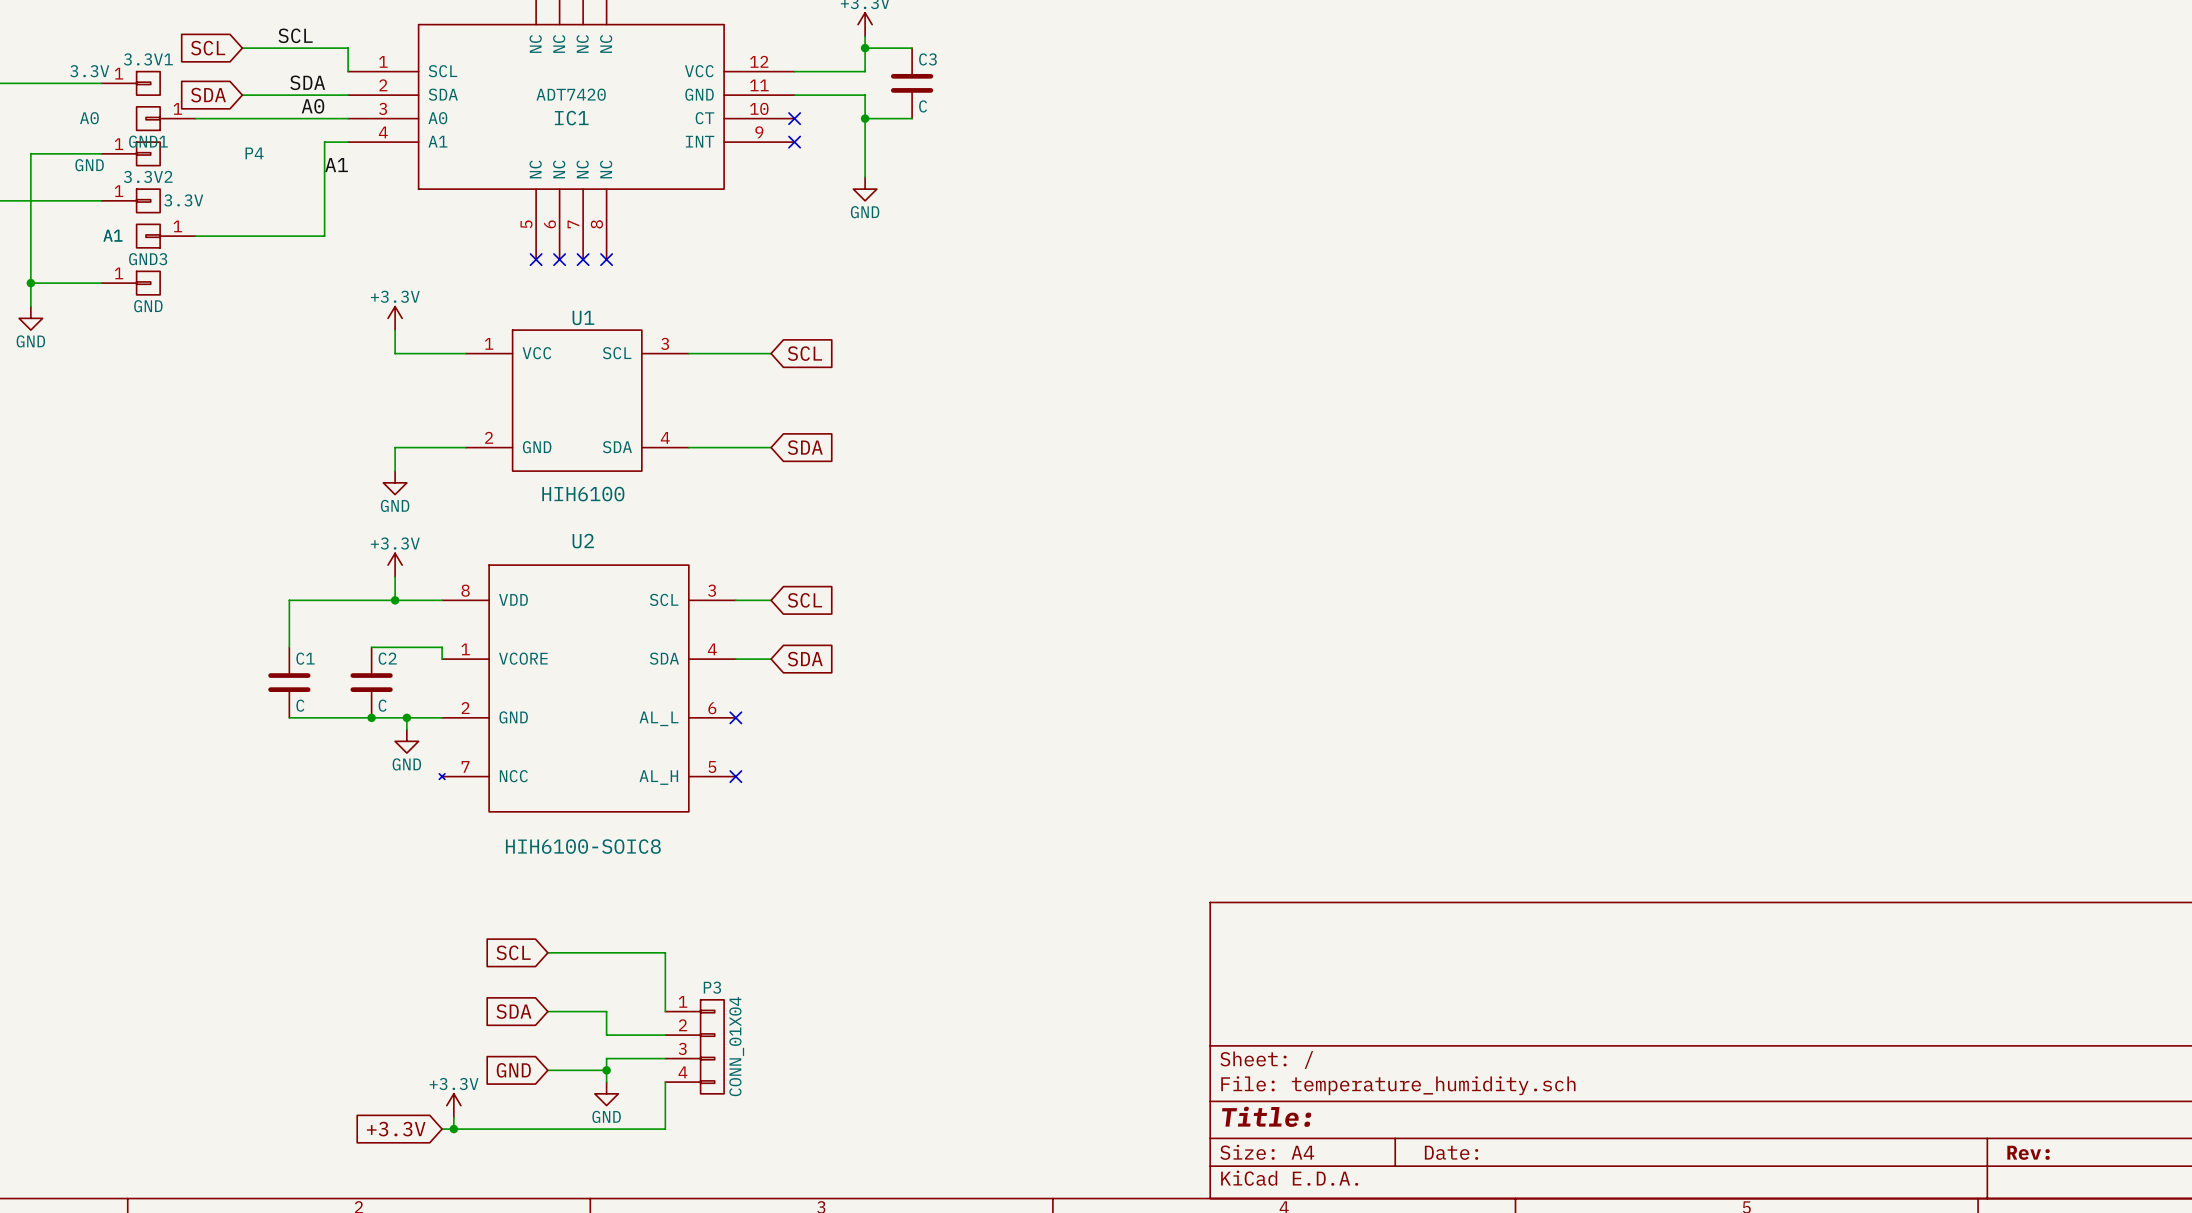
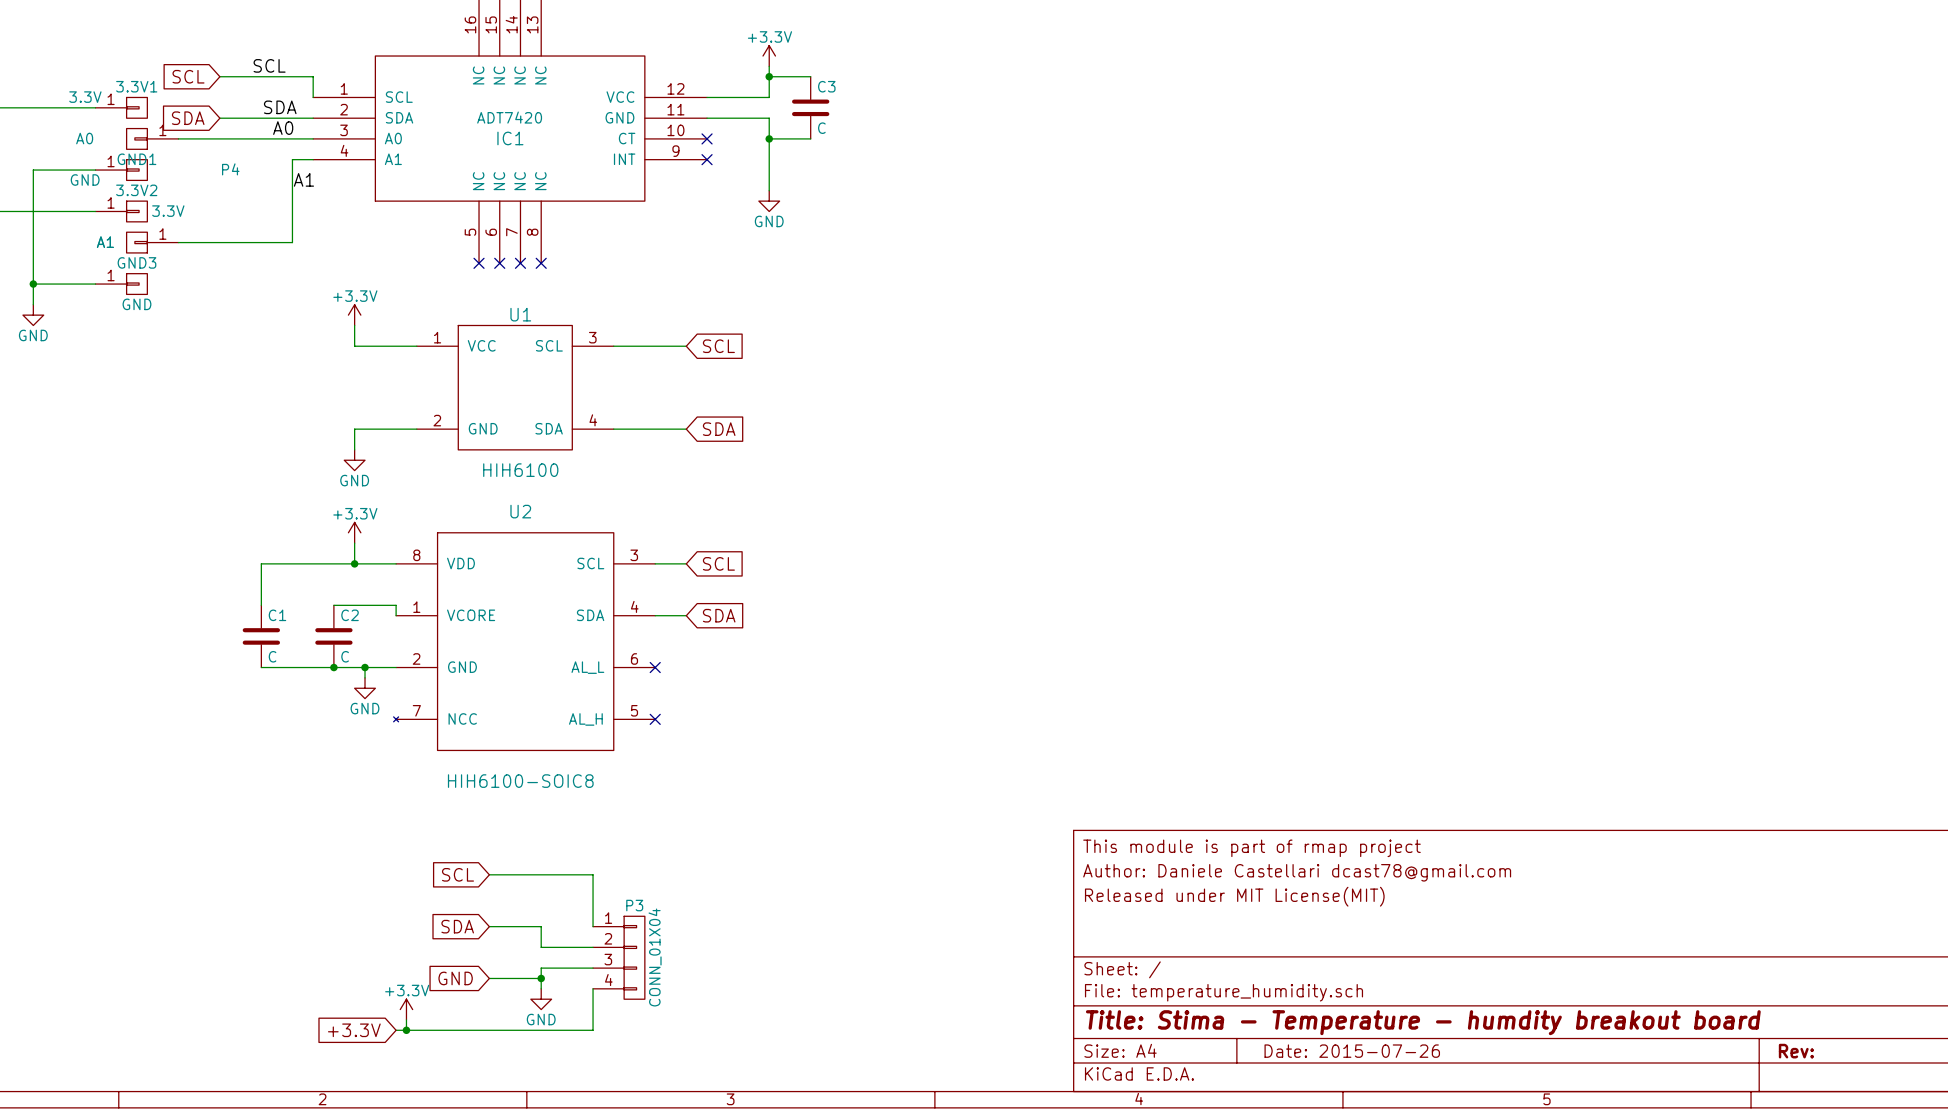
title block: none -> This module is part of rmap project (1251, 848)
title block: none -> Author: Daniele Castellari dcast78@gmail.com (1297, 872)
title block: none -> Released under MIT License(MIT) (1234, 896)
title block: Title: (1266, 1116) -> Title: Stima - Temperature - humdity breakout board (1423, 1022)
title block: Date: (1451, 1152) -> Date: 2015-07-26 (1352, 1051)

